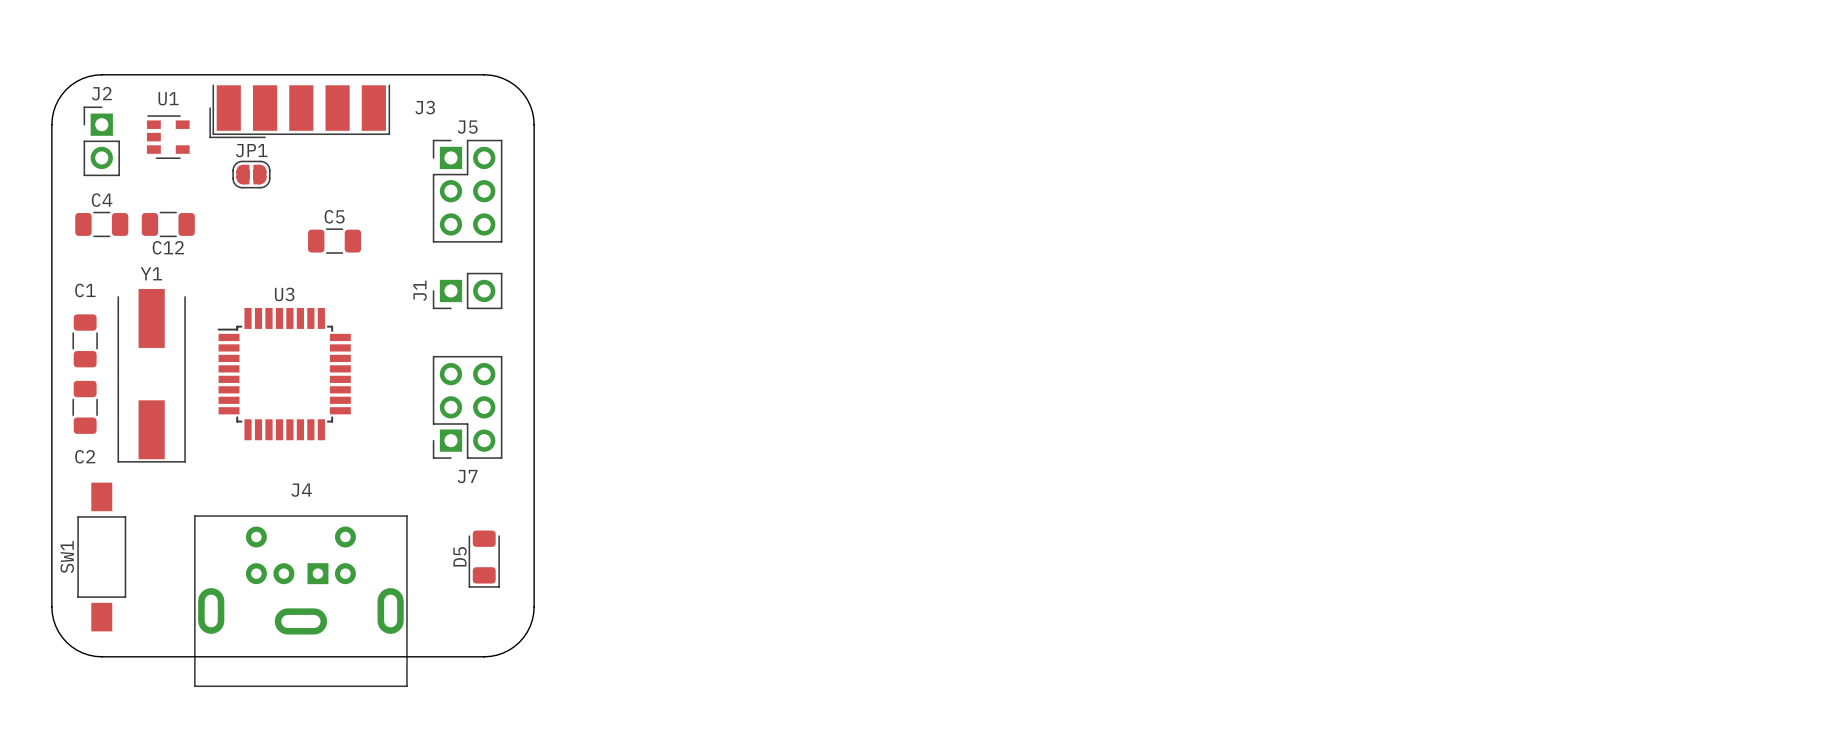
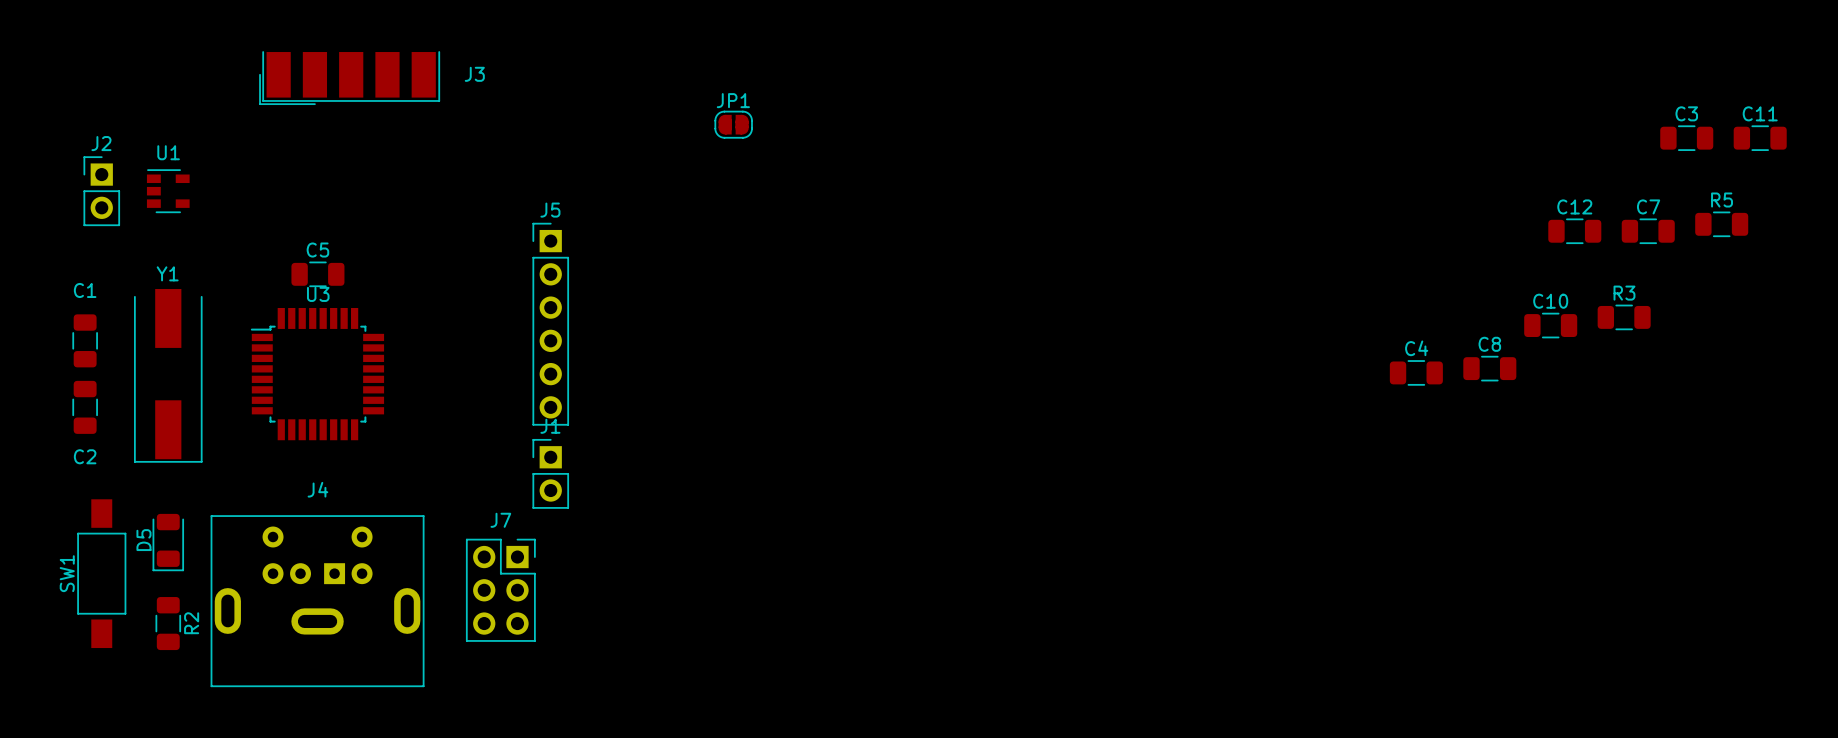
board edge: (101, 74) (484, 74) (503, 78) (514, 85) (523, 94) (530, 105) (534, 124) (534, 606) (530, 626) (523, 637) (514, 646) (497, 655) (484, 656) (101, 656) (88, 655) (76, 650) (62, 637) (55, 626) (51, 606) (52, 118) (58, 99) (66, 89) (82, 78) (101, 74) -> none
J3 position: (299, 111) -> (349, 78)
J5 name position: J5 (467, 127) -> J5 (550, 210)
U1 position: (168, 137) -> (168, 191)
C3: none -> (1686, 138)
C11: none -> (1760, 138)
J5 footprint: [432, 139, 503, 243] -> [532, 222, 569, 426]
J2 position: (101, 141) -> (101, 191)
JP1 position: (251, 174) -> (733, 124)
C4 position: (101, 224) -> (1416, 372)
C12 position: (168, 224) -> (1574, 231)
R5: none -> (1721, 224)
C7: none -> (1648, 231)
C5 position: (334, 241) -> (317, 274)
C12 name position: C12 (168, 247) -> C12 (1574, 206)
J1 rotation: 0° (467, 290) -> 90° clockwise (550, 473)
J1 position: (467, 290) -> (550, 473)
R3: none -> (1624, 317)
C10: none -> (1550, 325)
C8: none -> (1489, 368)
U3 position: (284, 374) -> (317, 374)
Y1 position: (151, 375) -> (168, 375)
J7 rotation: 0° (467, 407) -> 180° (500, 590)
J7 position: (467, 407) -> (500, 590)
SW1 position: (101, 557) -> (101, 573)
D5 position: (484, 559) -> (168, 542)
J4 position: (300, 601) -> (317, 601)
R2: none -> (168, 623)

